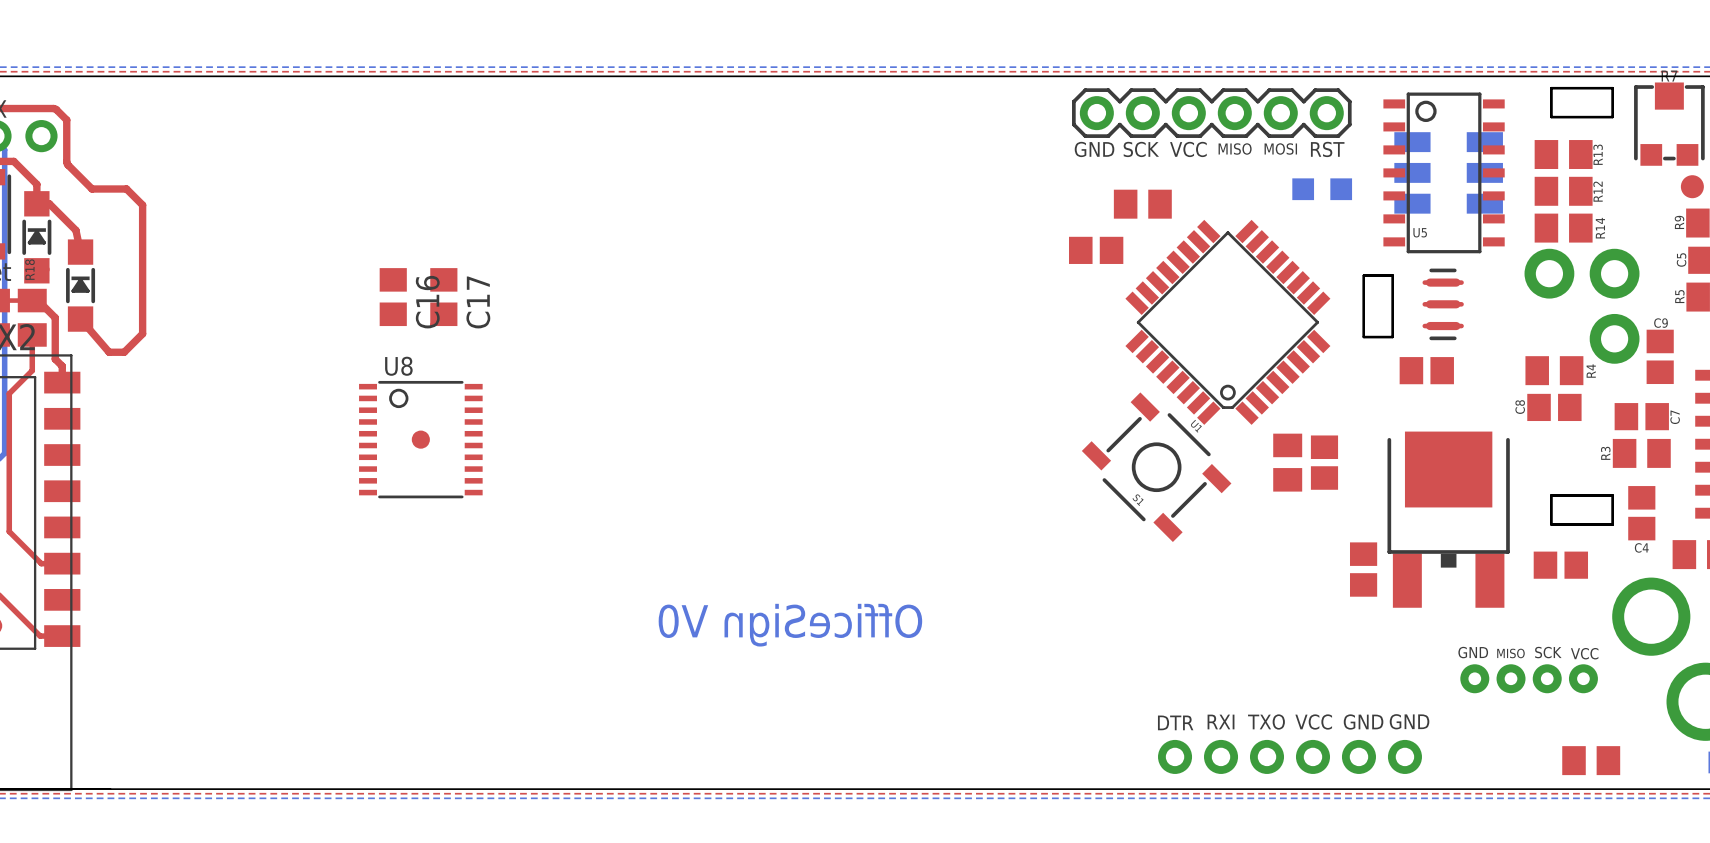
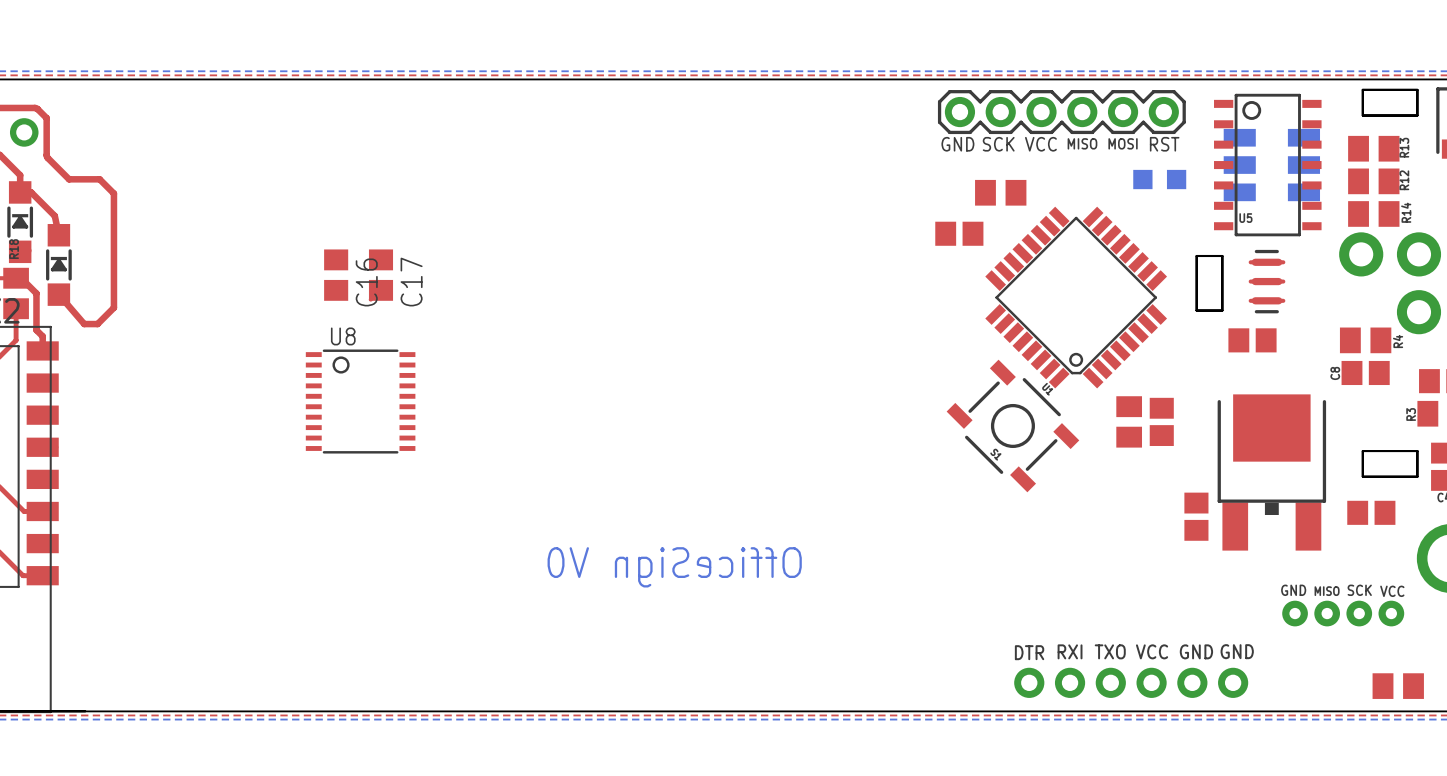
part: (420, 439) -> none

